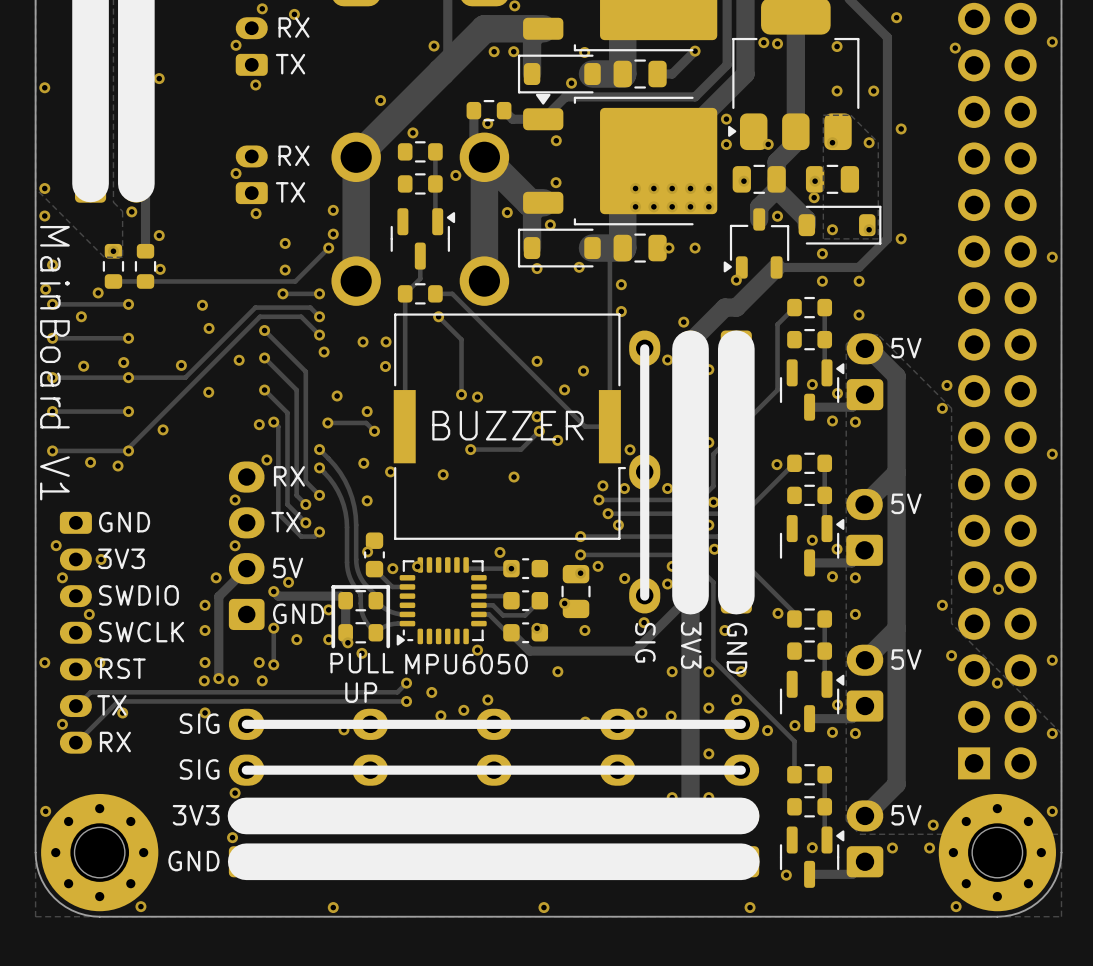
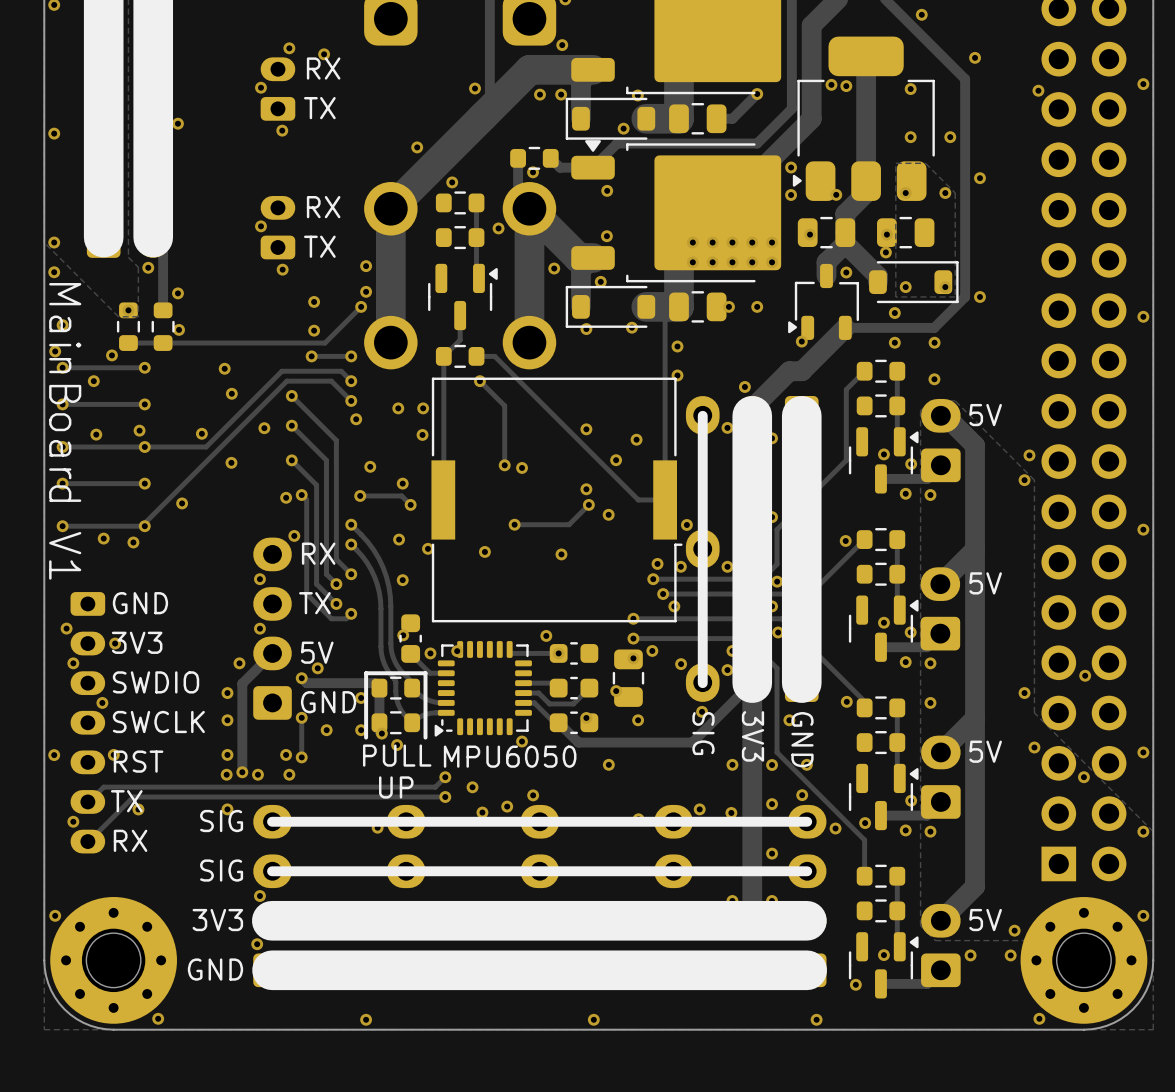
text: BUZZER (507, 425) -> none

